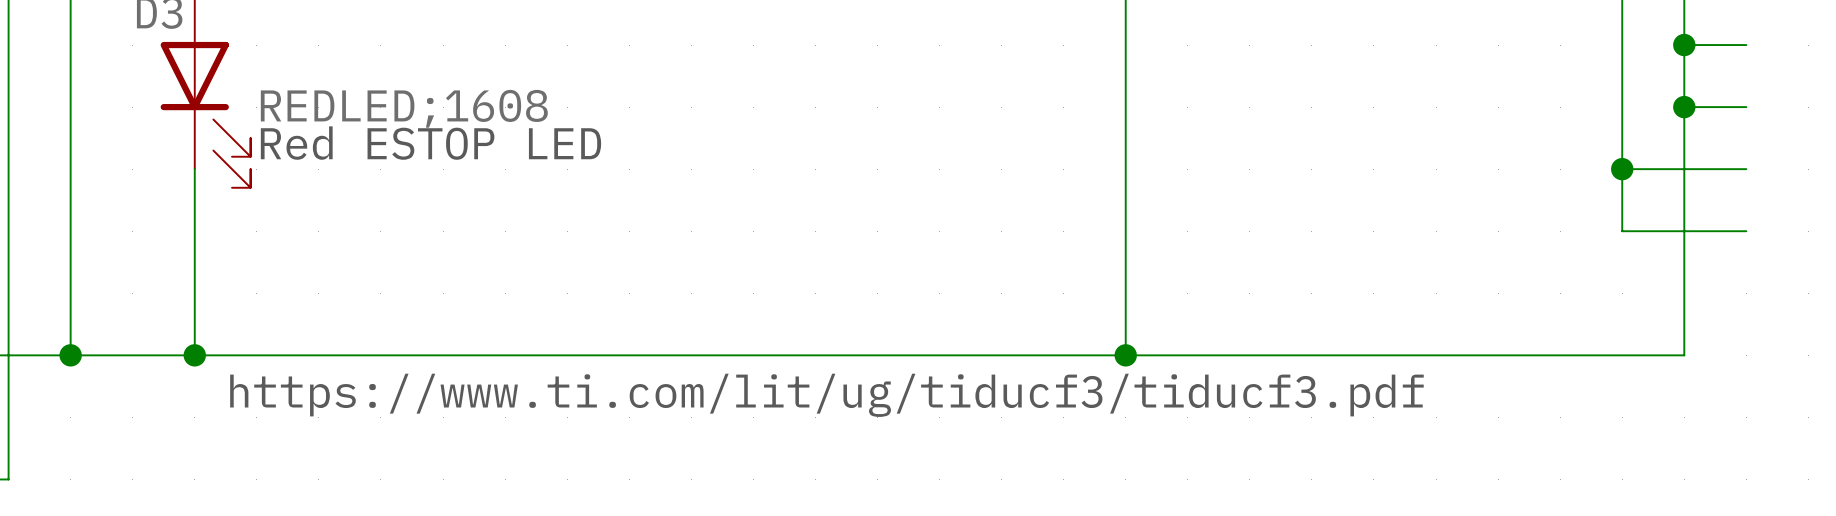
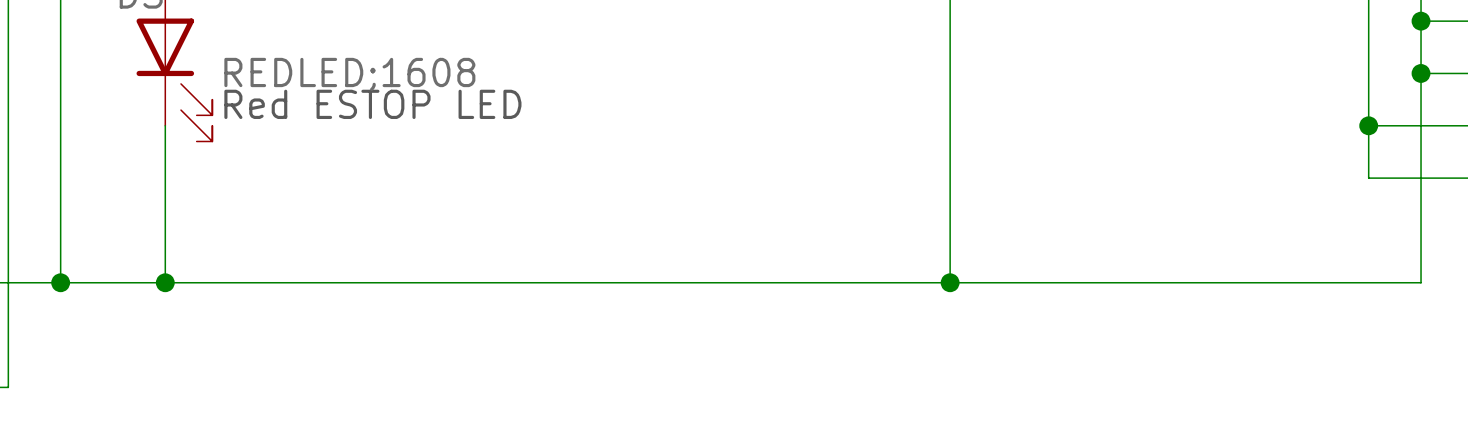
text: https://www.ti.com/lit/ug/tiducf3/tiducf3.pdf (826, 395) -> none

